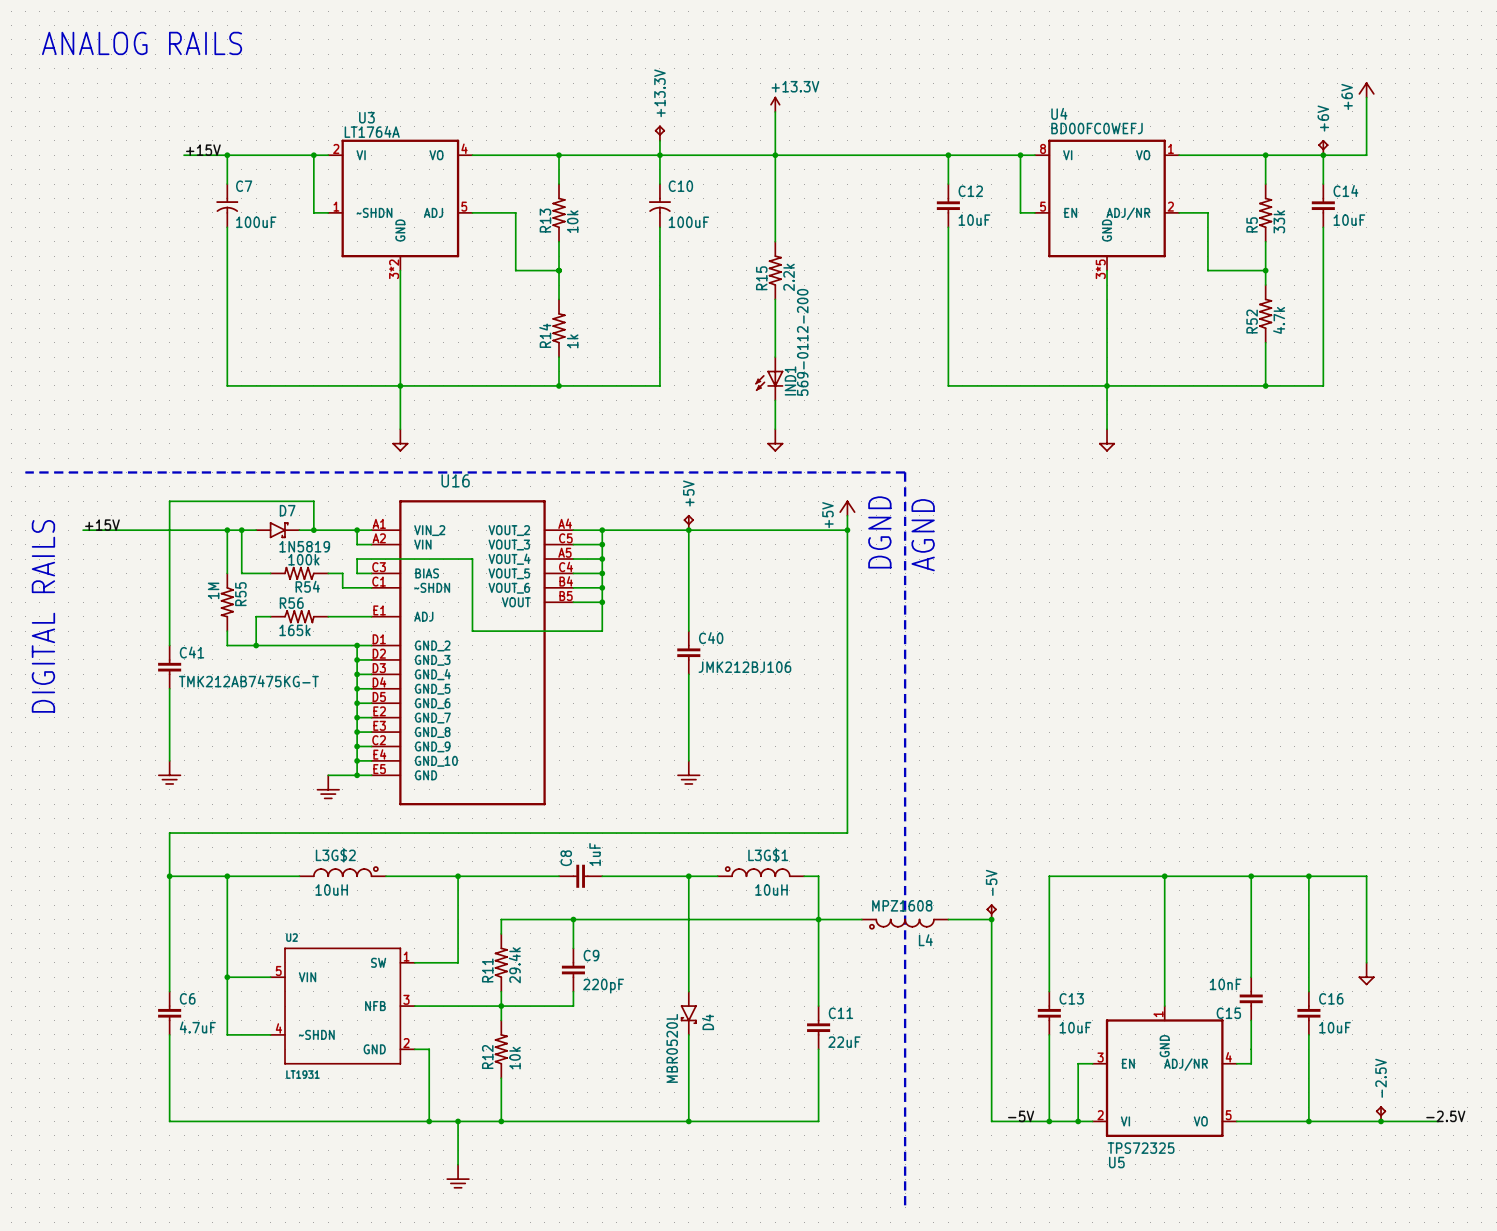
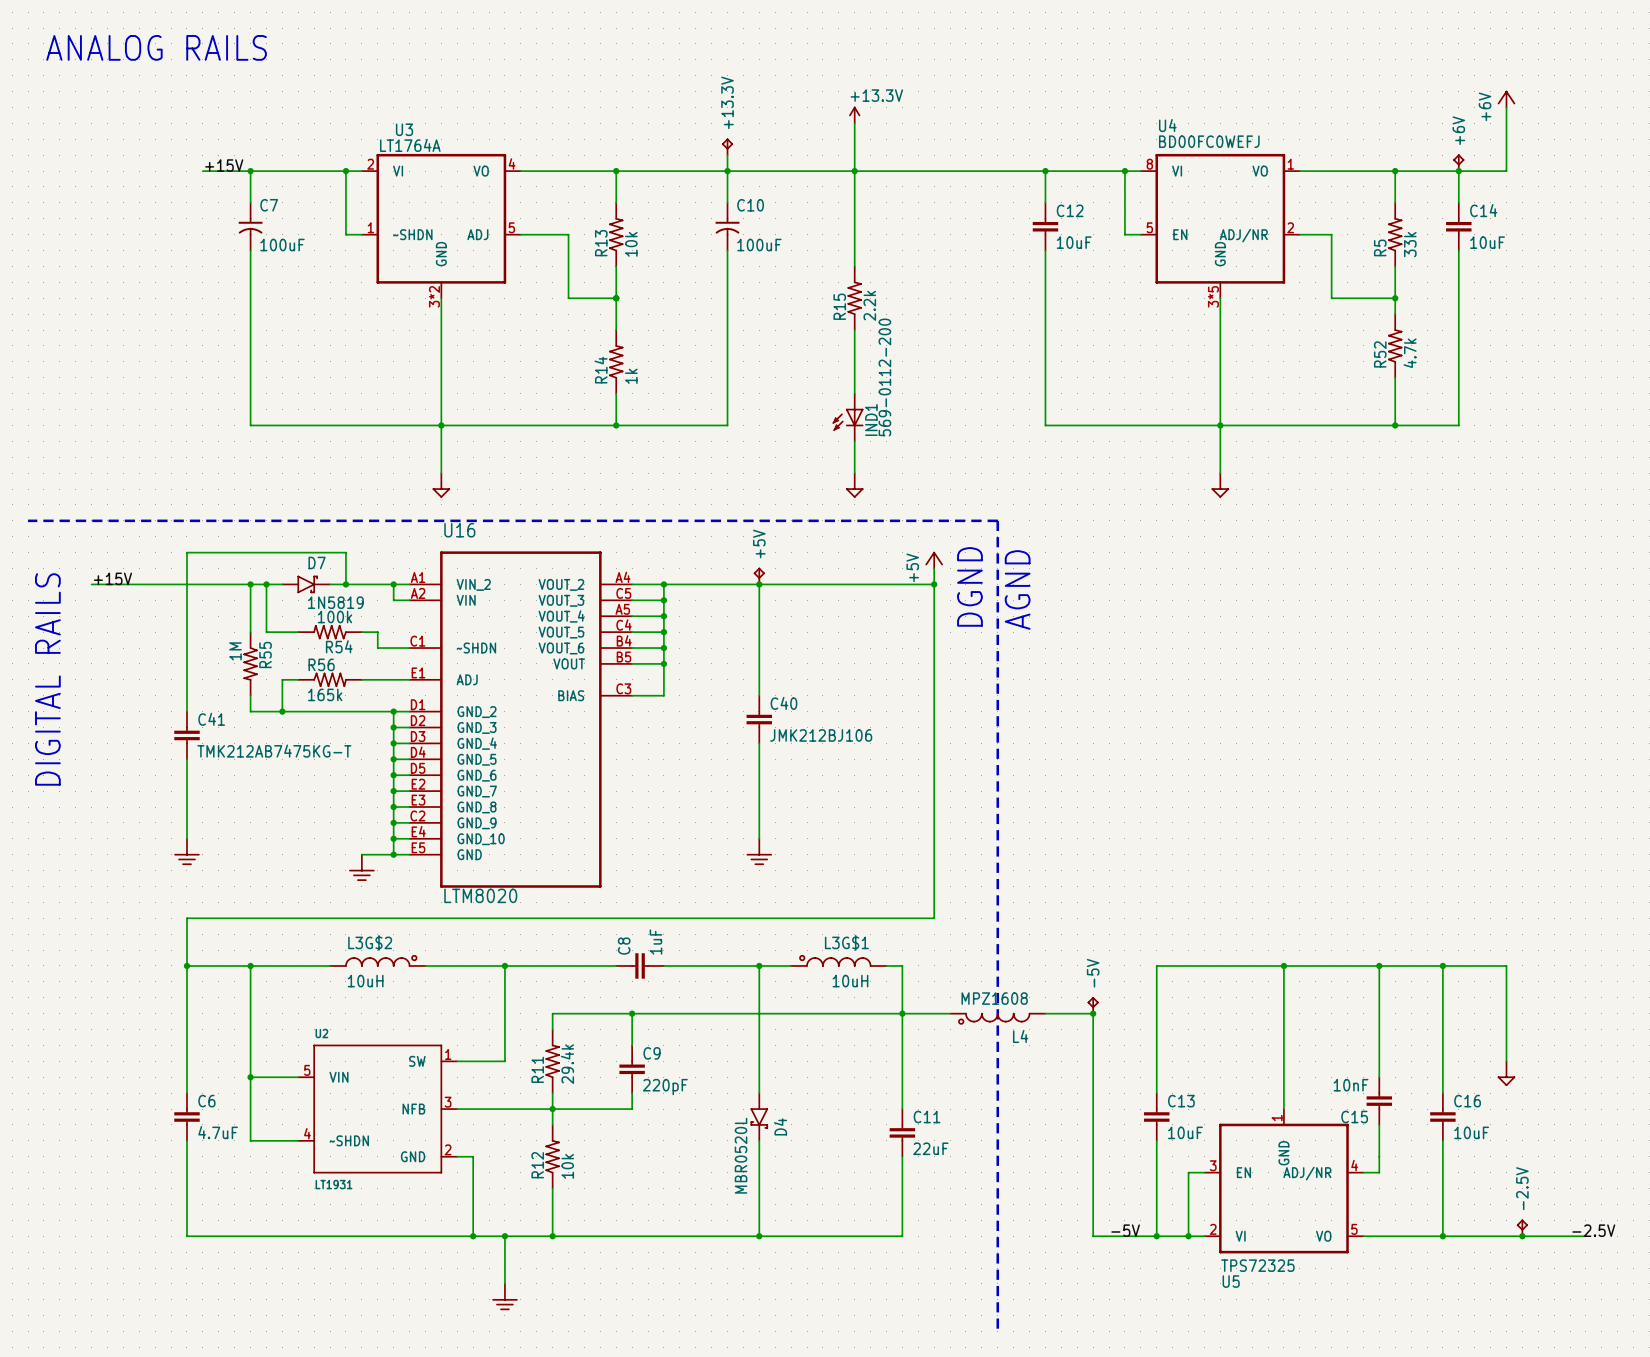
U16 name position: U16 (455, 480) -> U16 (459, 530)
U16 symbol: [371, 500, 574, 806] -> [409, 551, 633, 888]
wire: (371, 573) (357, 573) (357, 559) (472, 559) (472, 631) (573, 631) -> none
U16 value: none -> LTM8020 (480, 895)

